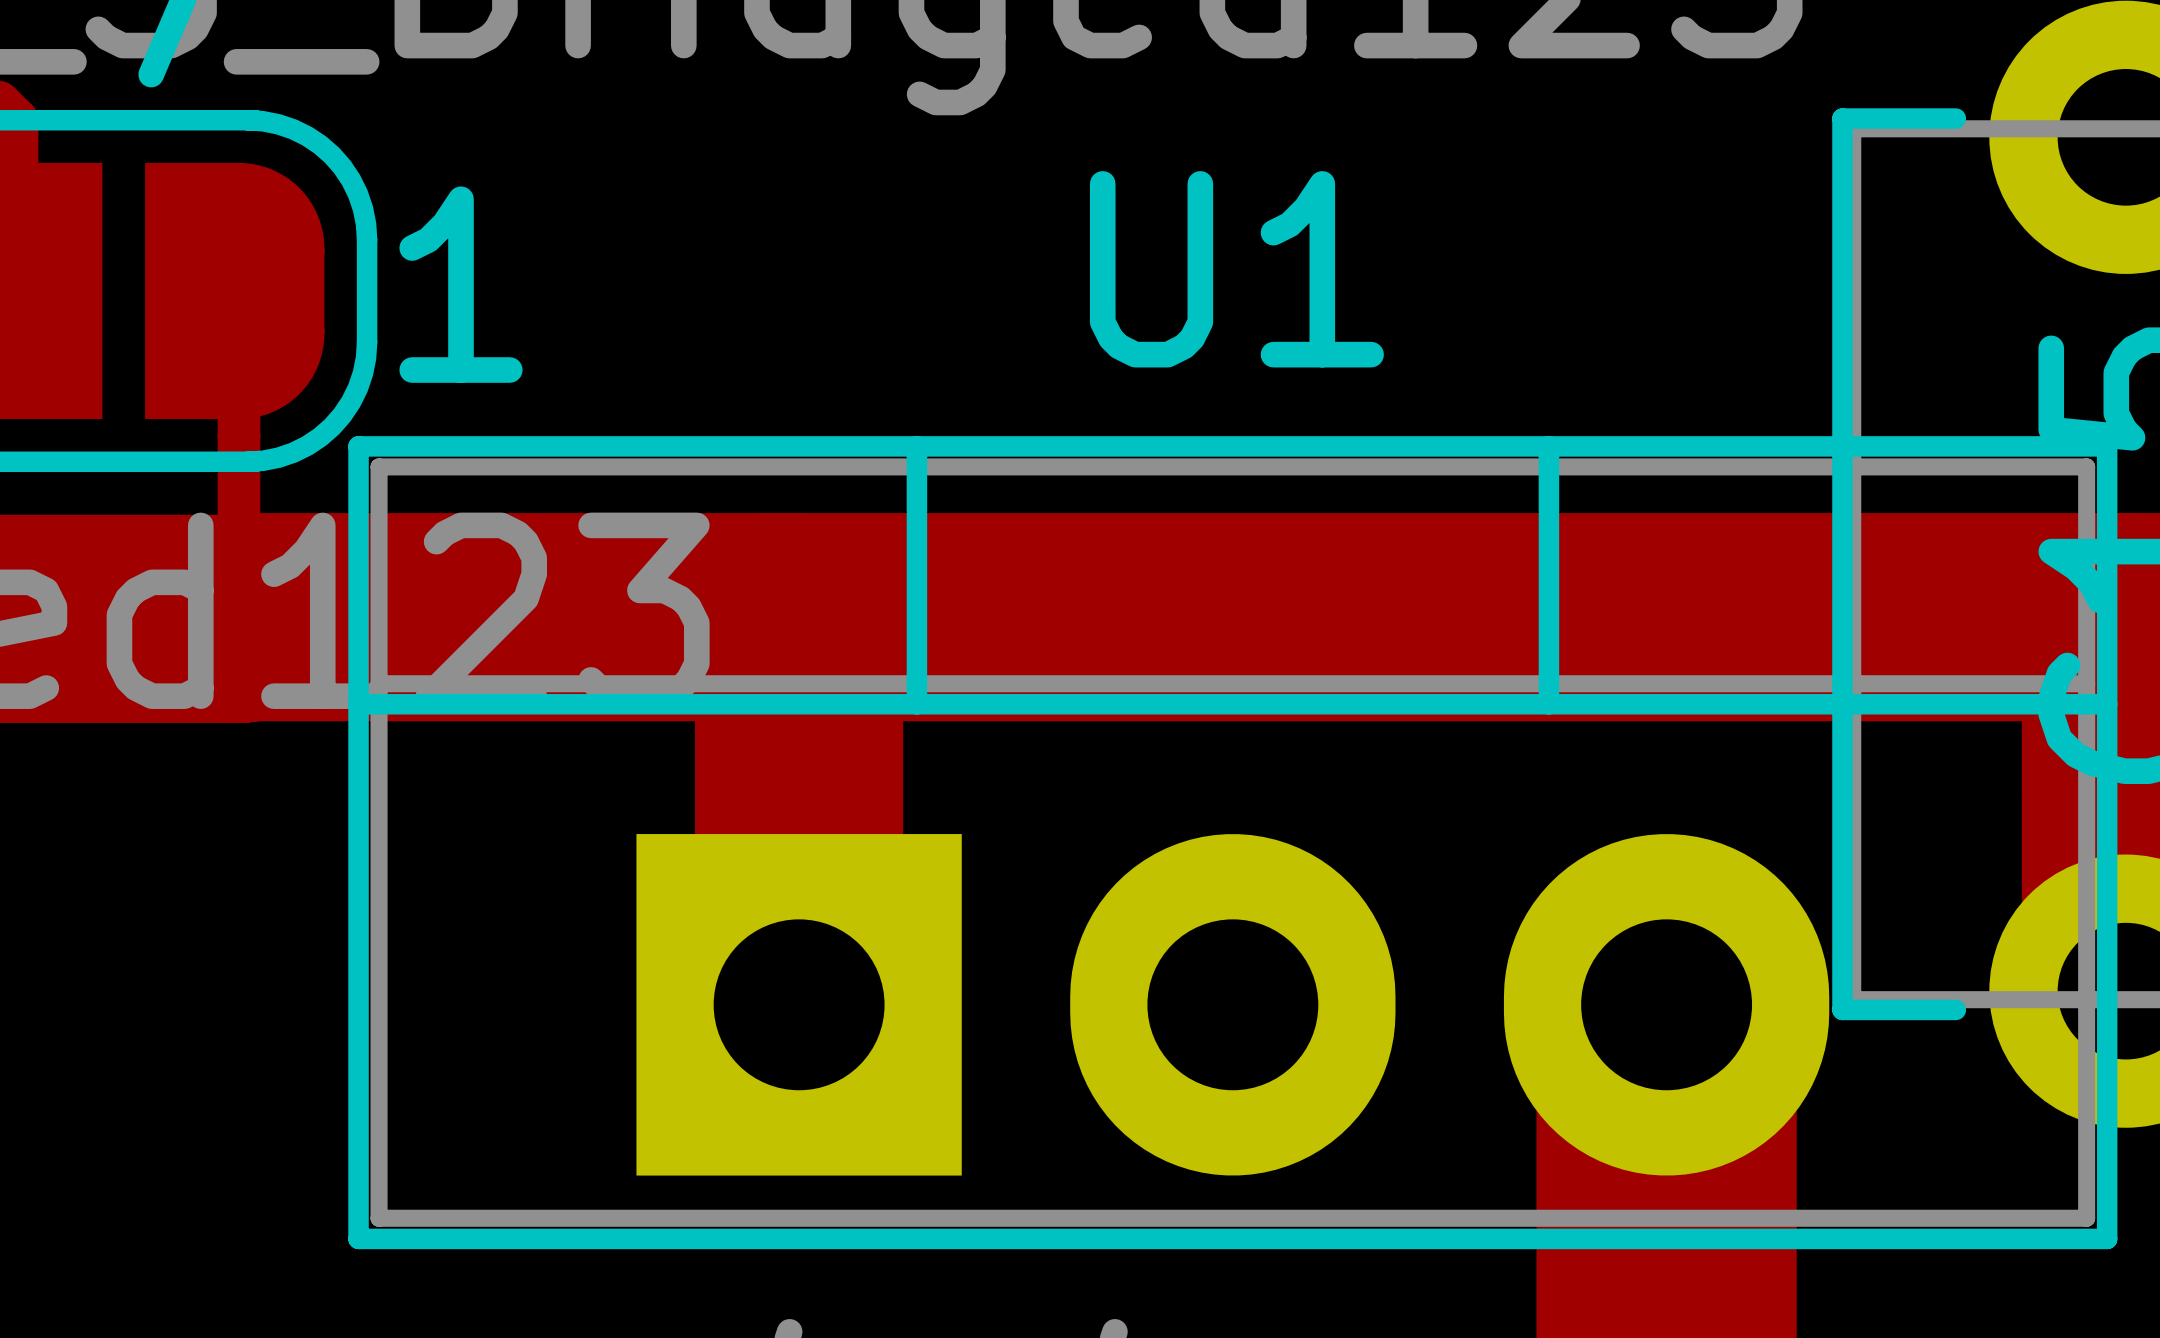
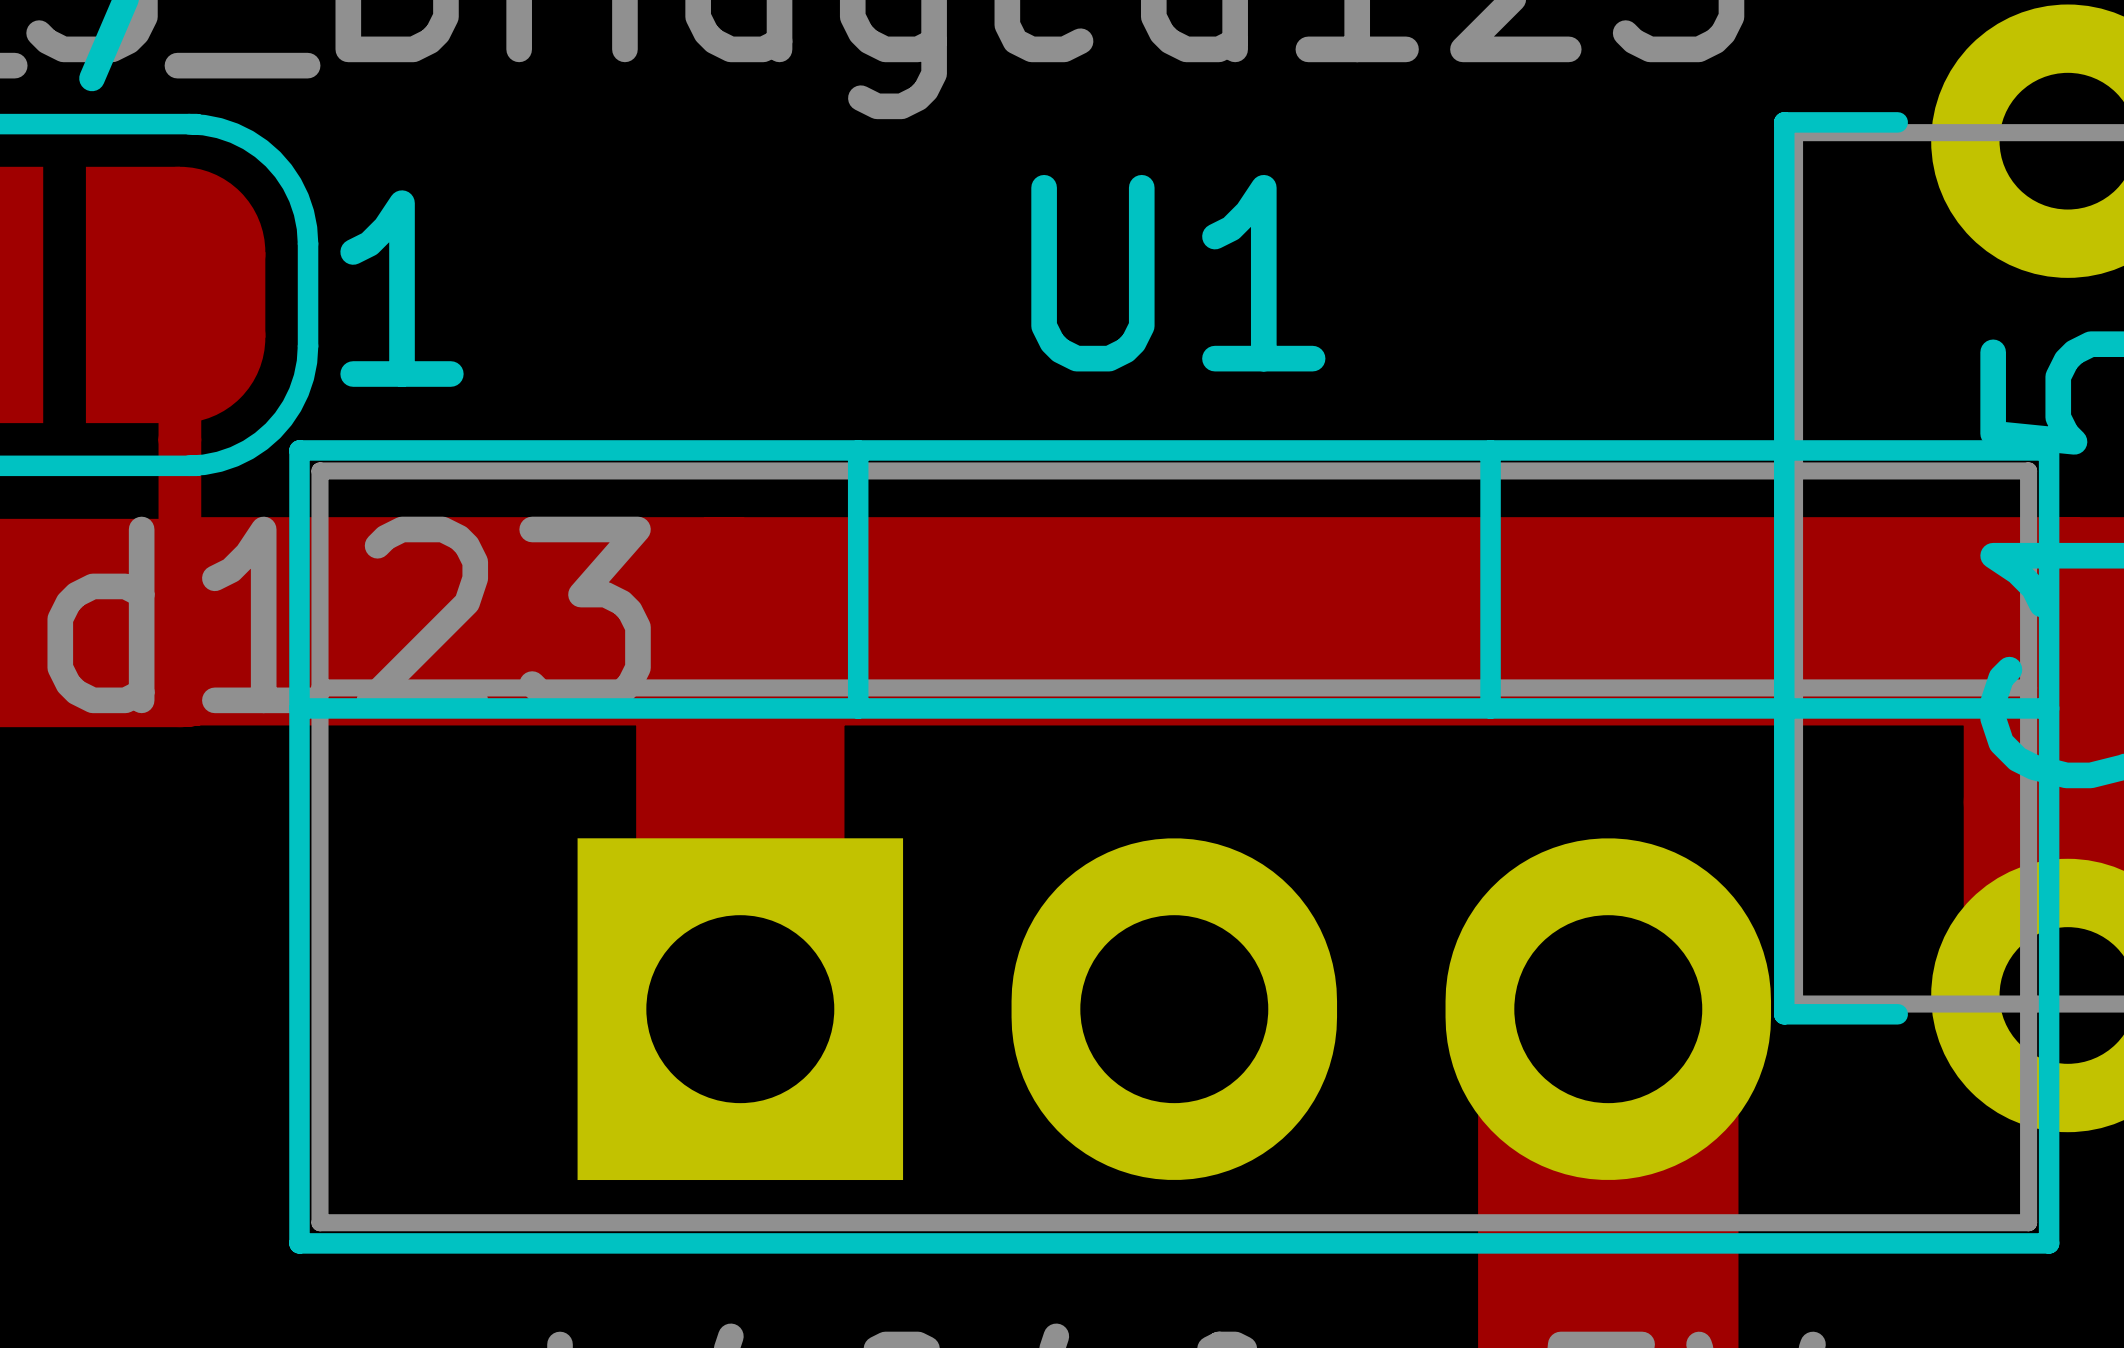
U1 footprint: [348, 436, 2118, 1250] -> [289, 440, 2060, 1254]

